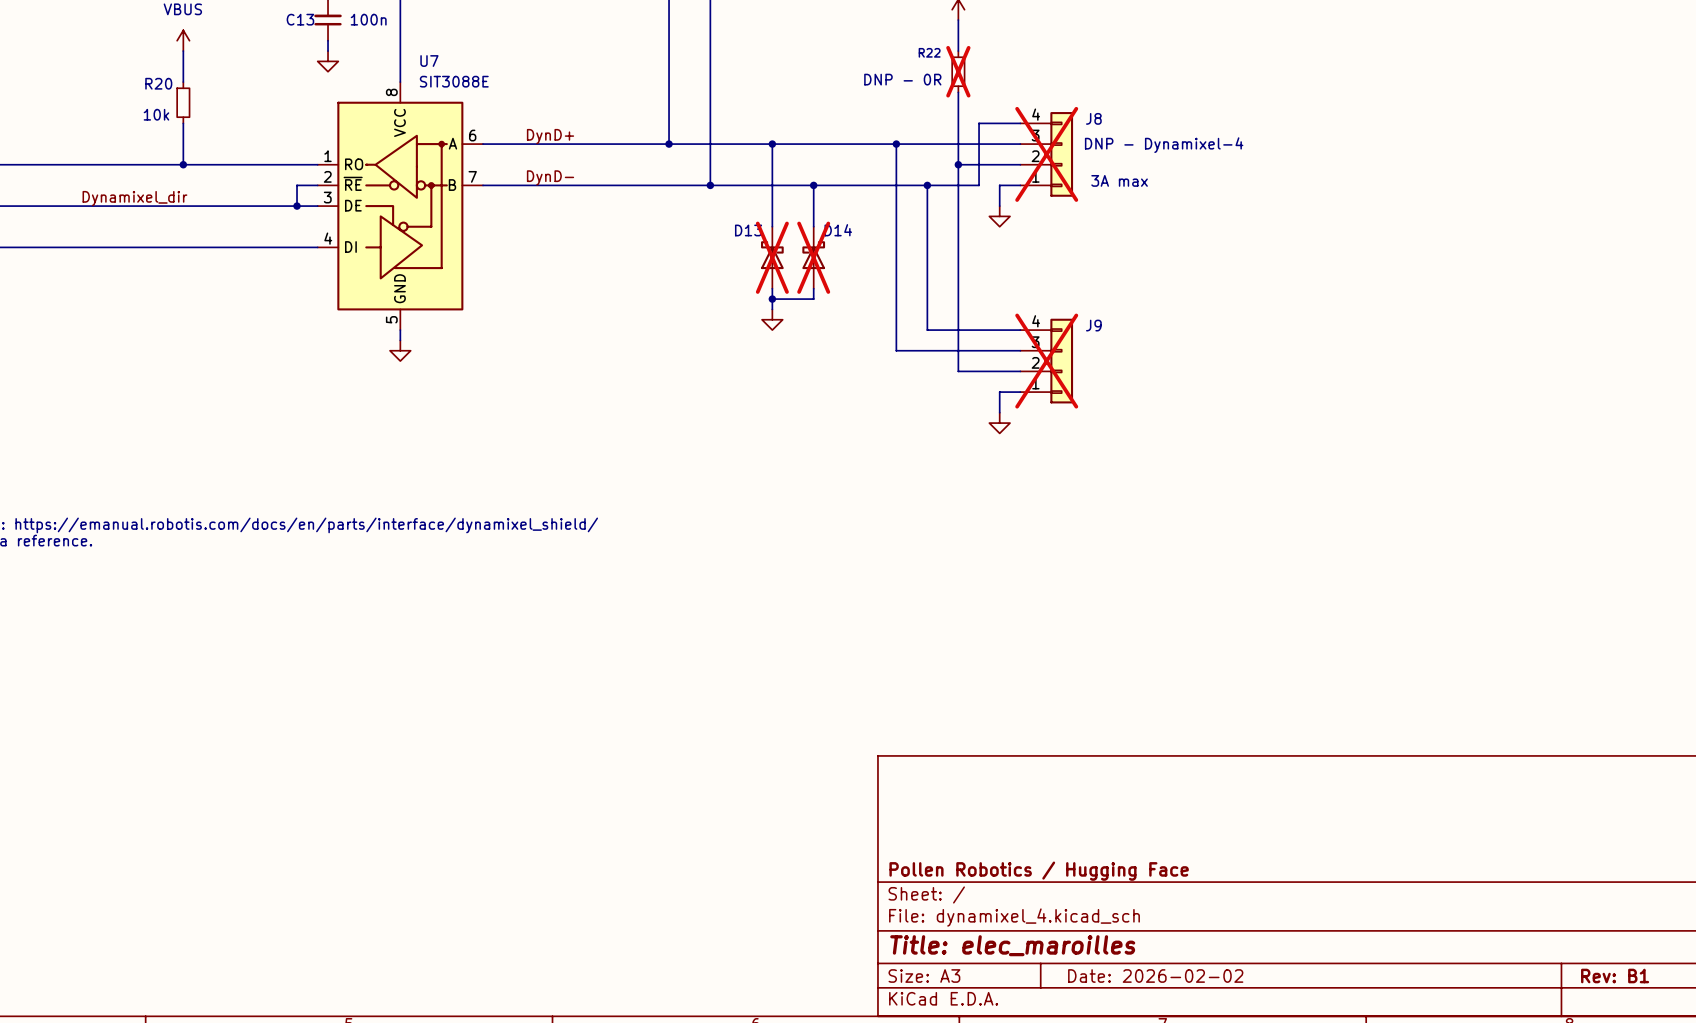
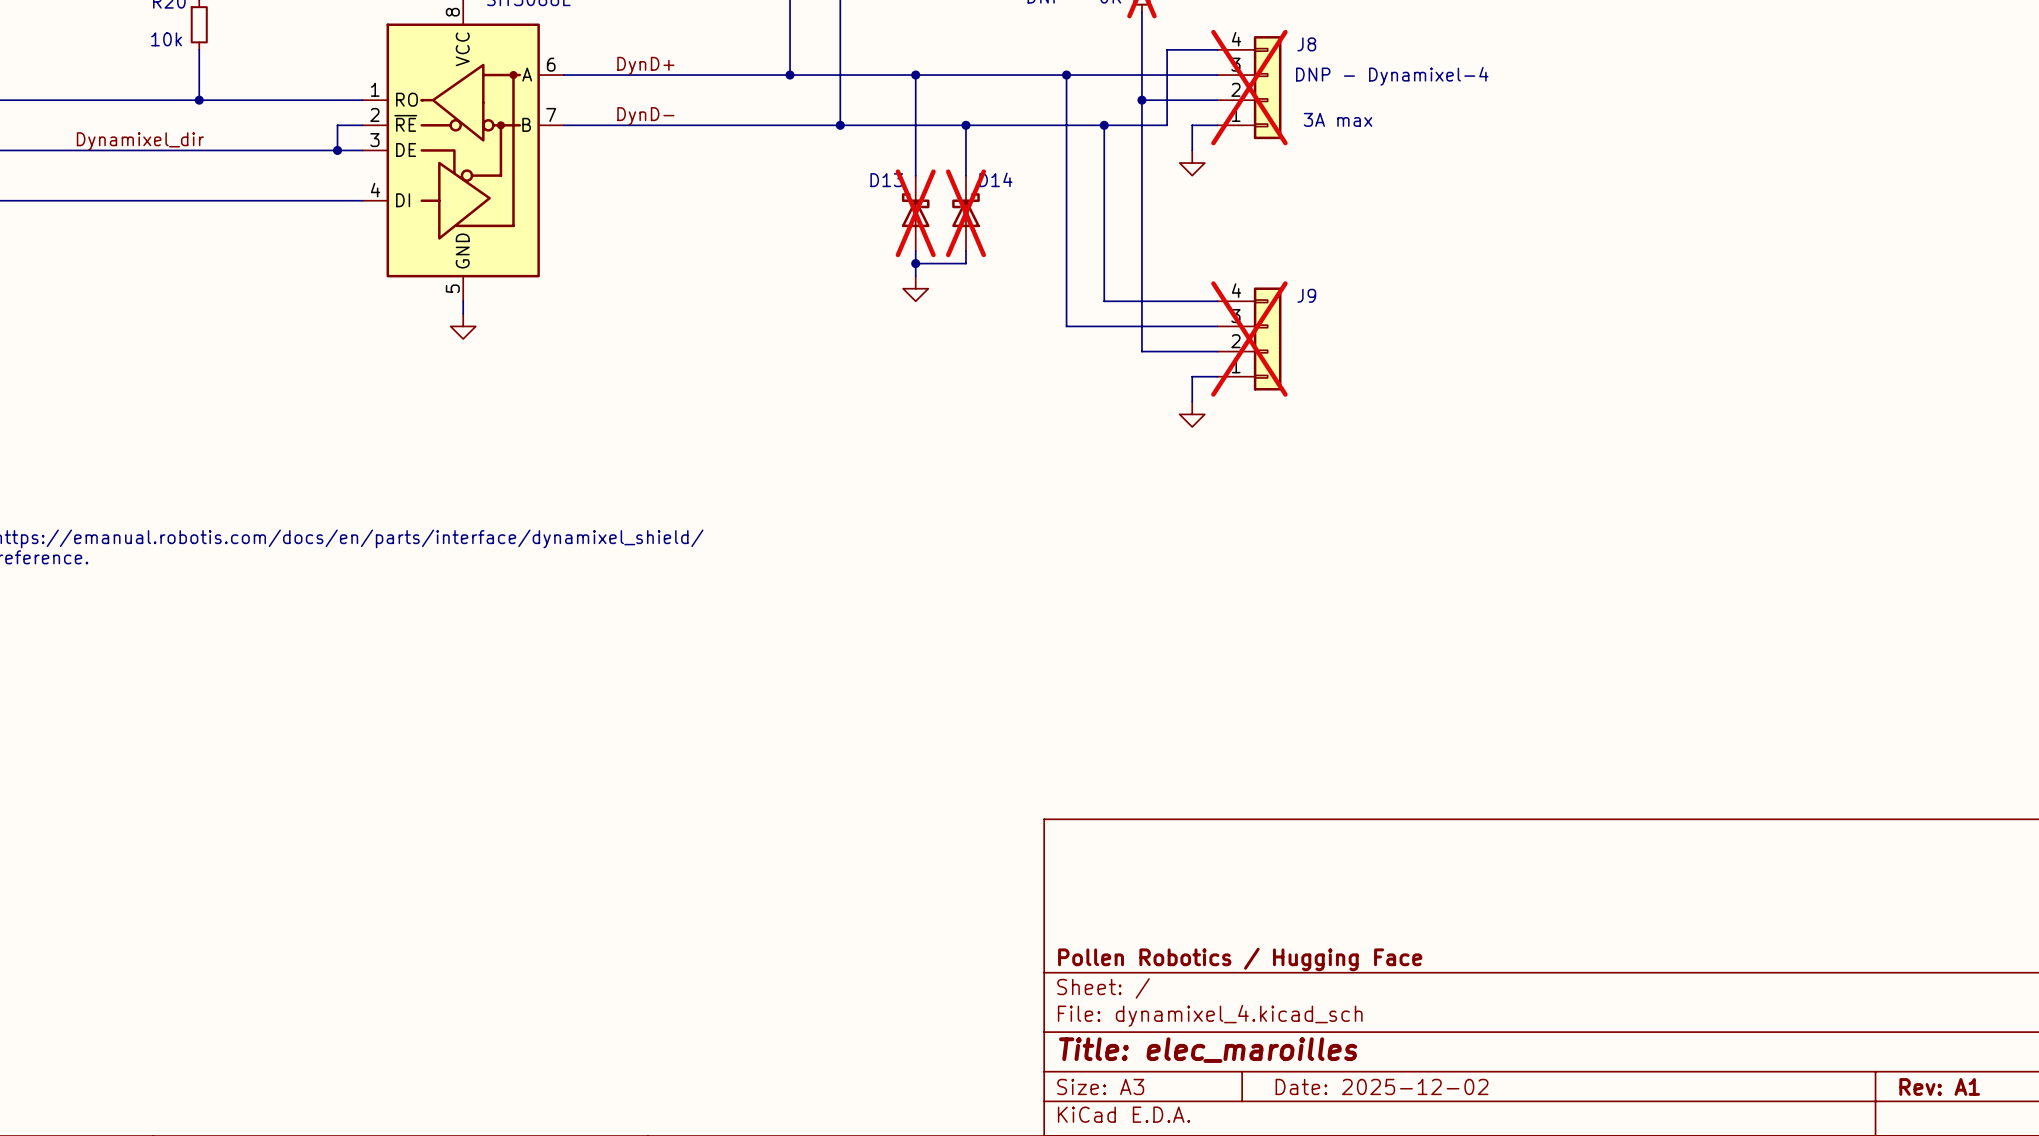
title block: Date: 2026-02-02 (1155, 976) -> Date: 2025-12-02 (1382, 1086)
title block: Rev: B1 (1615, 976) -> Rev: A1 (1939, 1086)

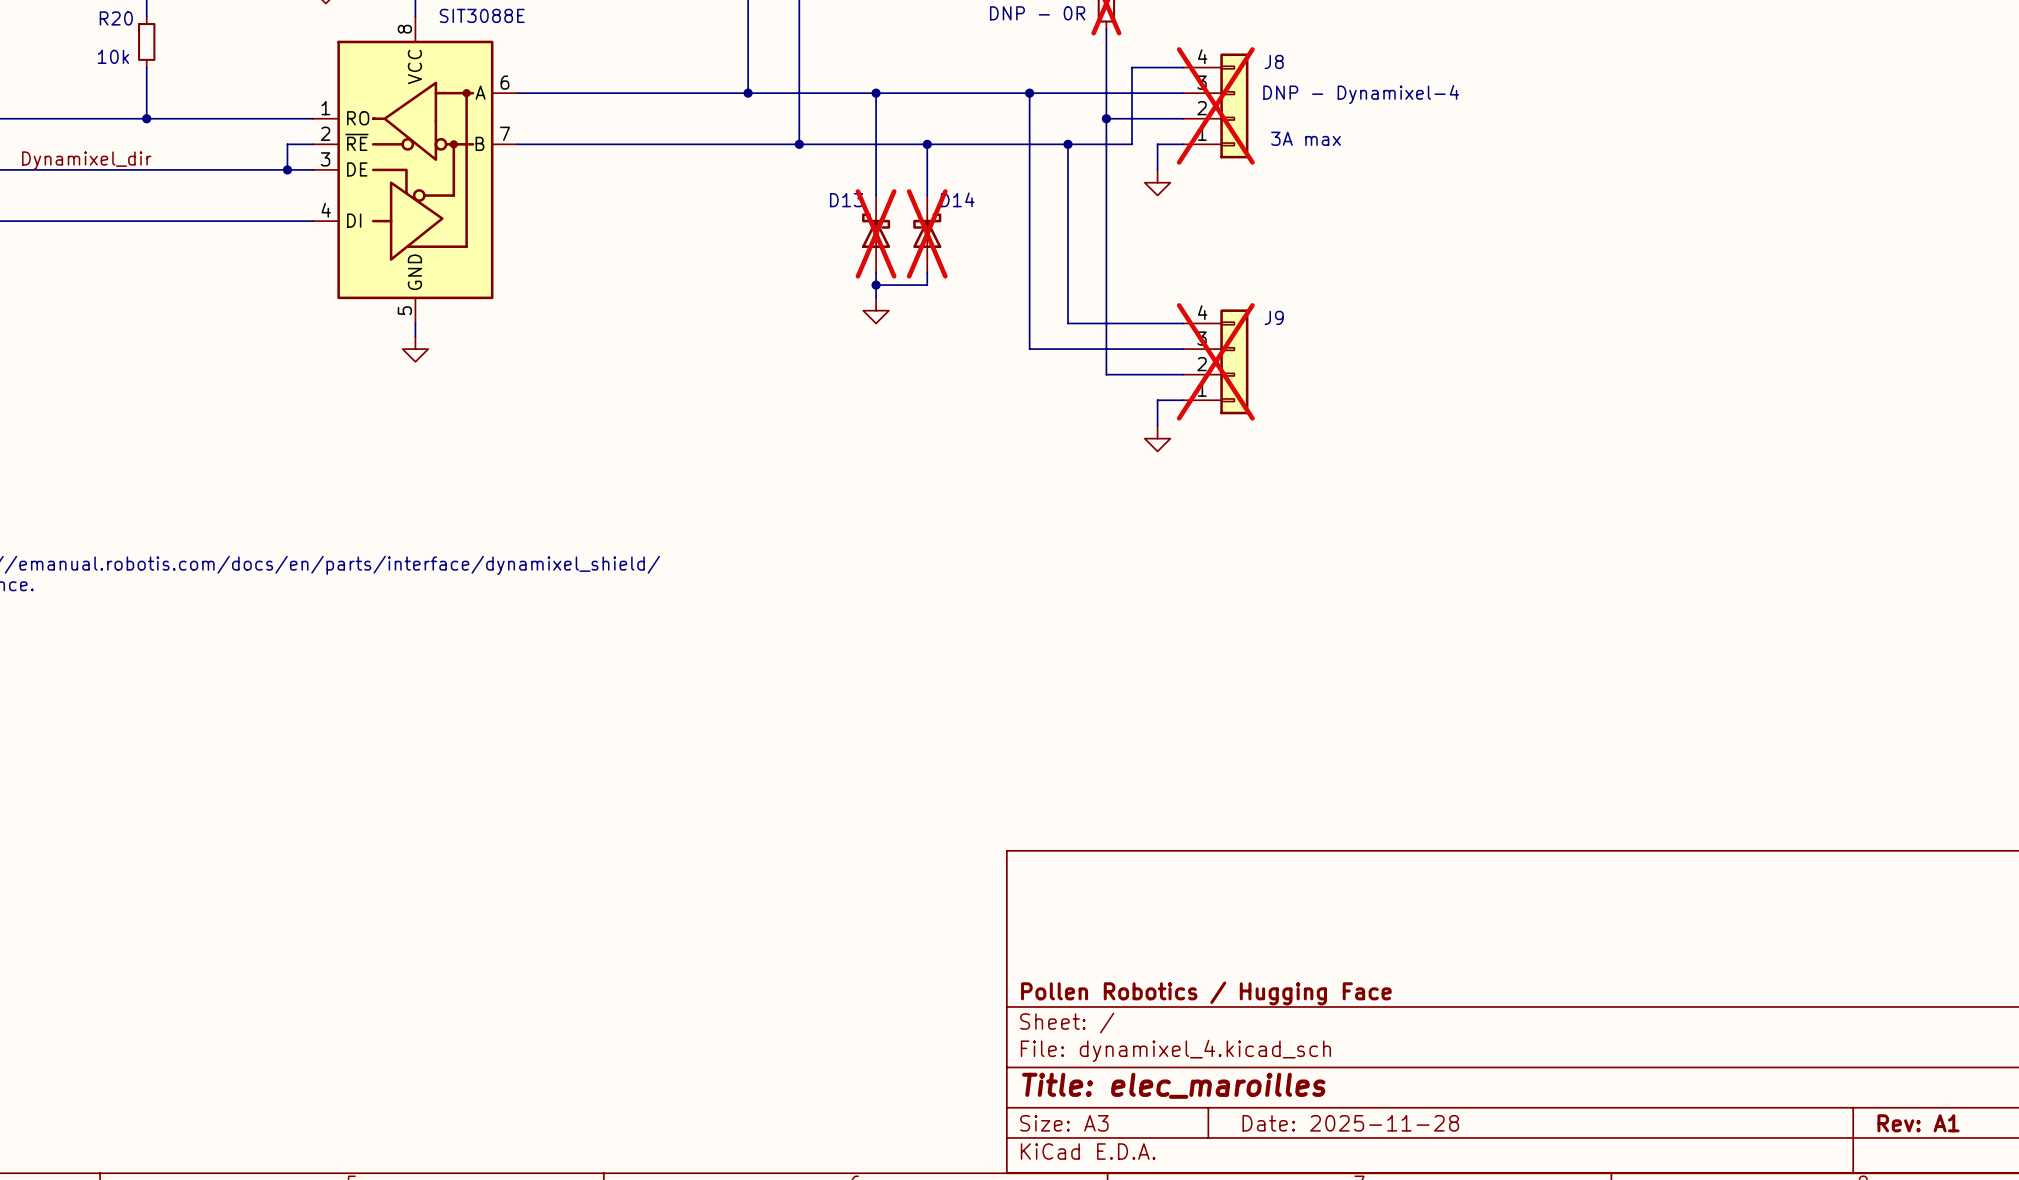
label: DynD+ (645, 65) -> none
label: DynD- (645, 116) -> none
title block: Date: 2025-12-02 (1382, 1086) -> Date: 2025-11-28 (1350, 1123)

